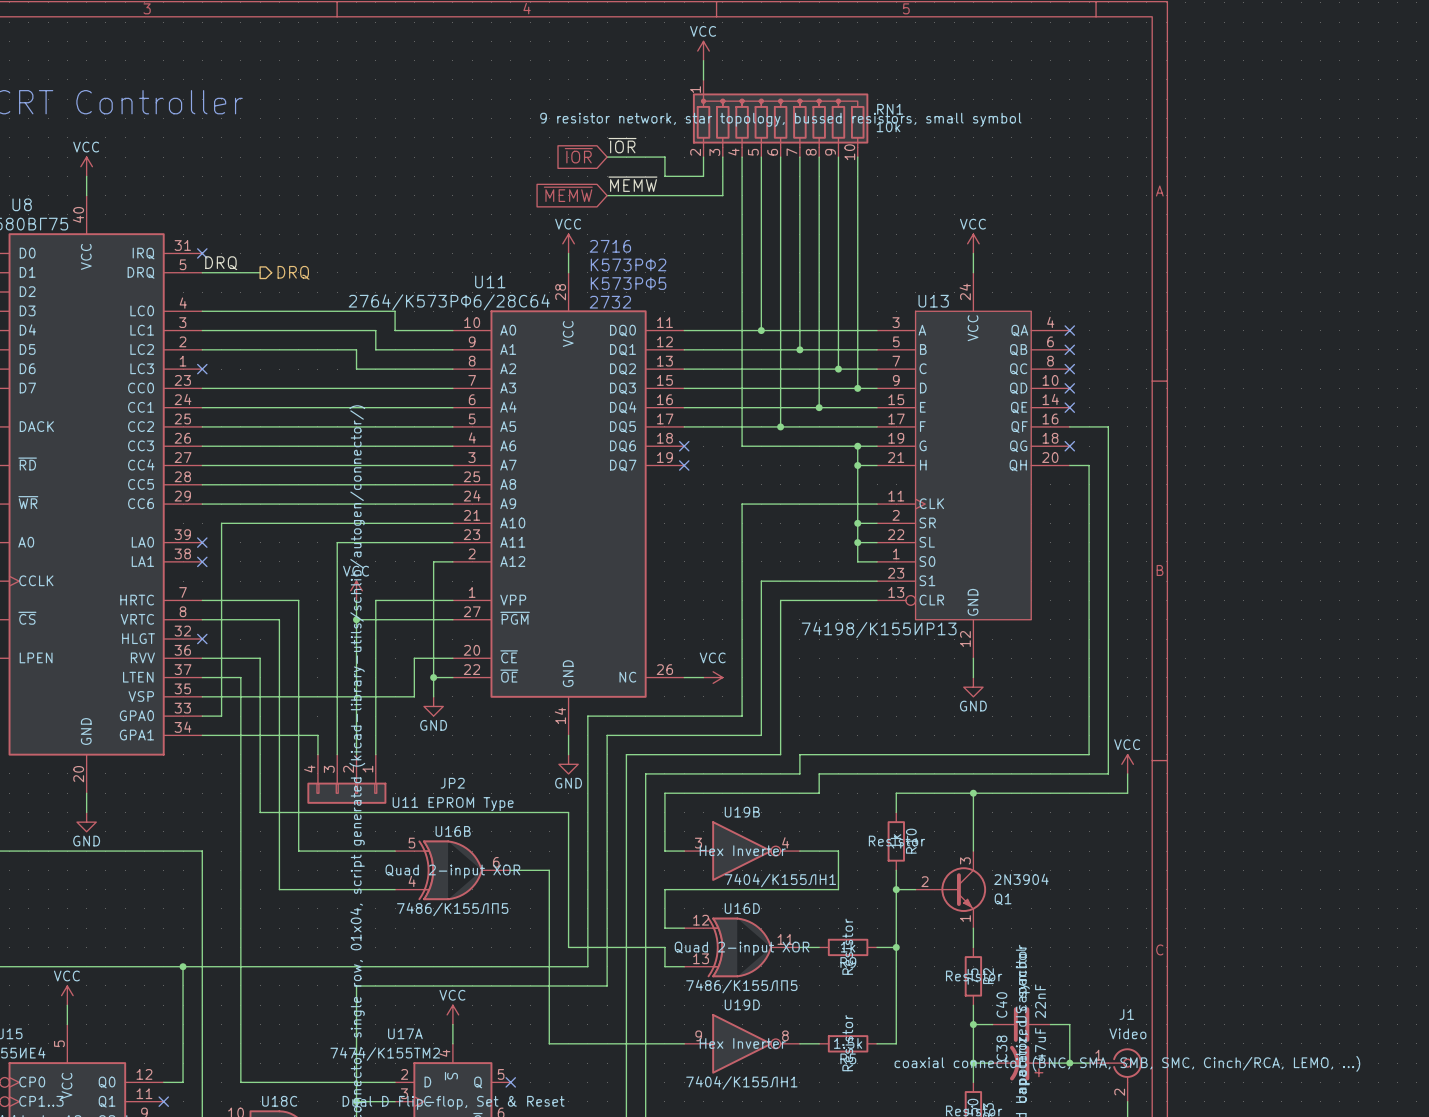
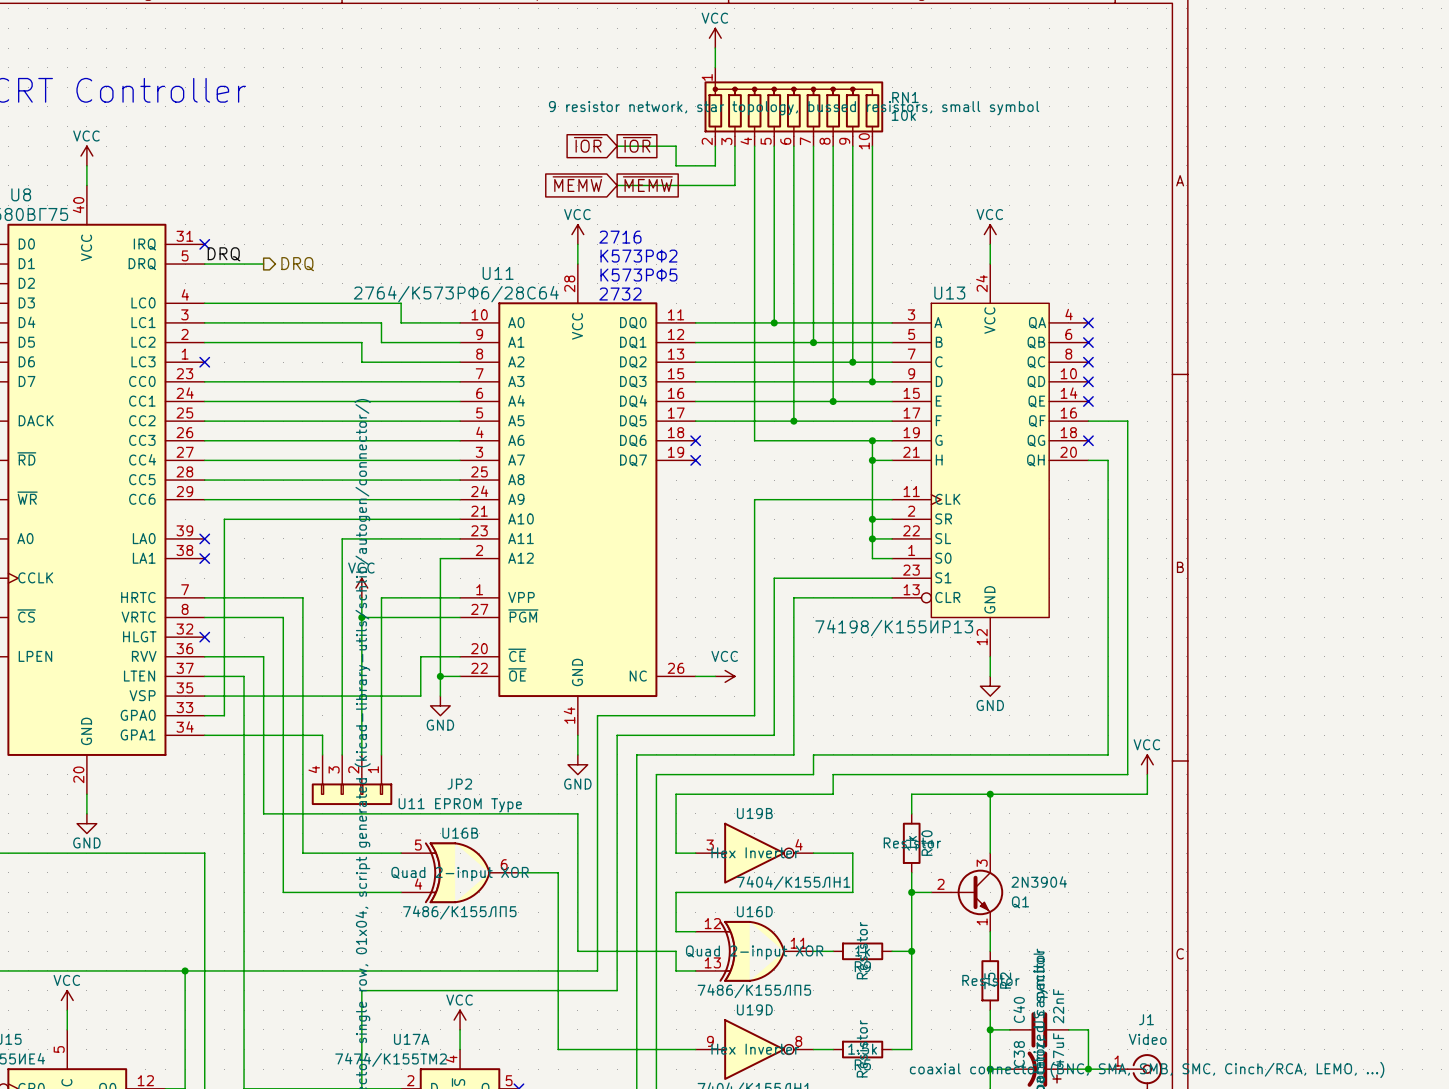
label: ~{IOR} (622, 145) -> none
global label: none -> ~{IOR} (637, 144)
label: ~{MEMW} (632, 184) -> none
global label: none -> ~{MEMW} (647, 184)

